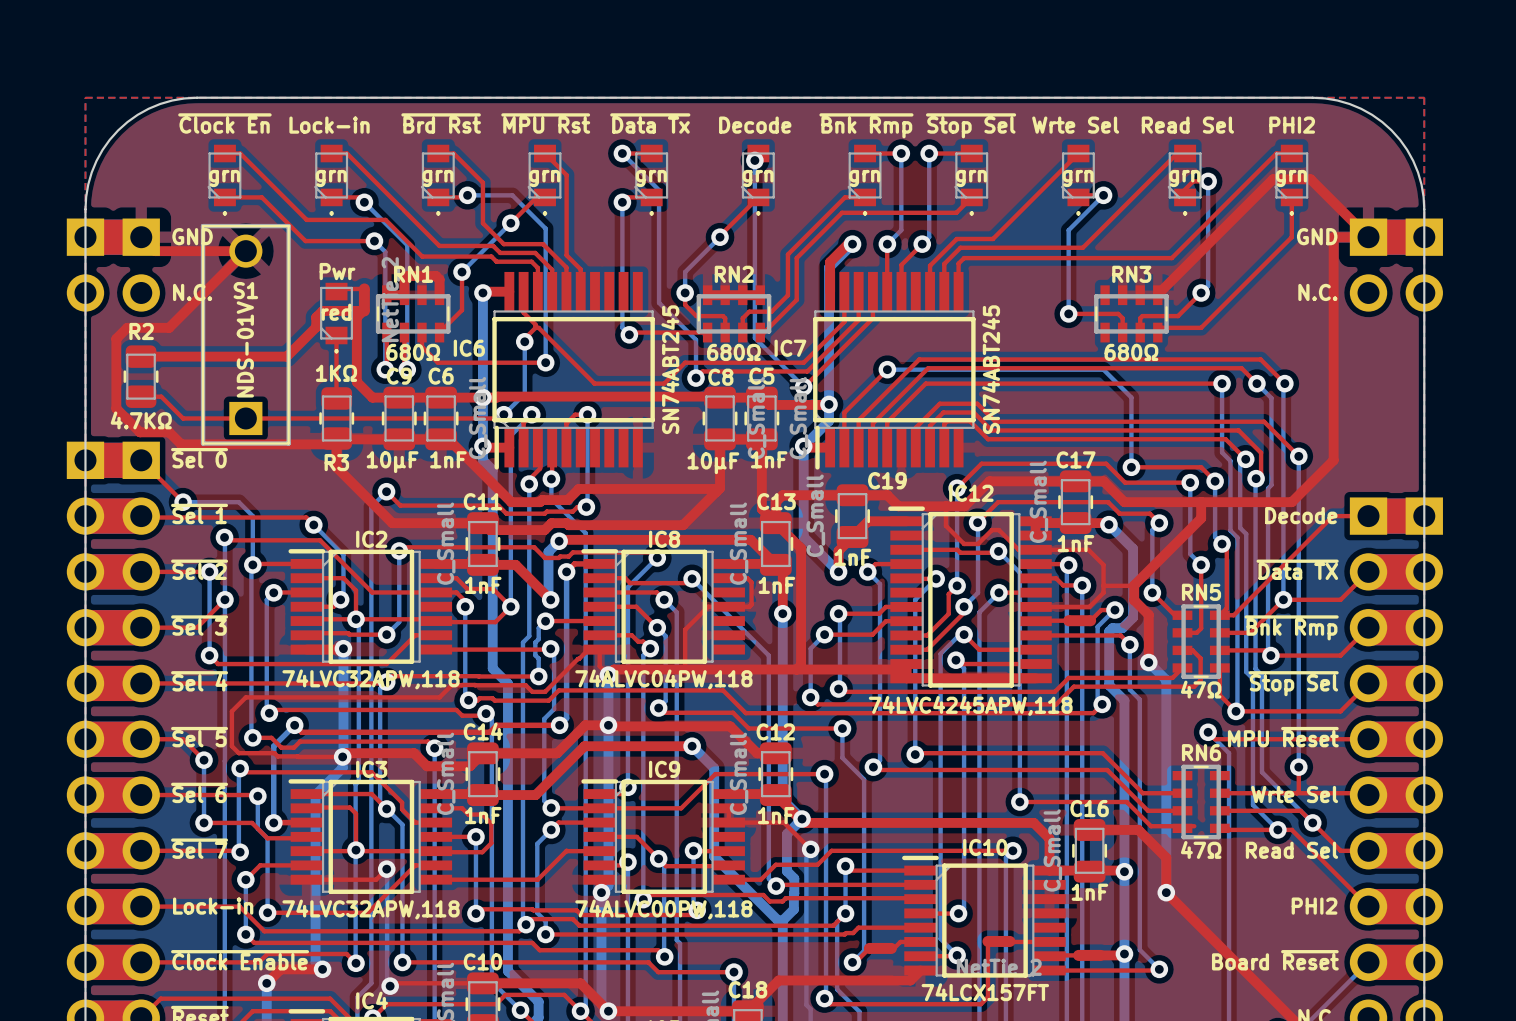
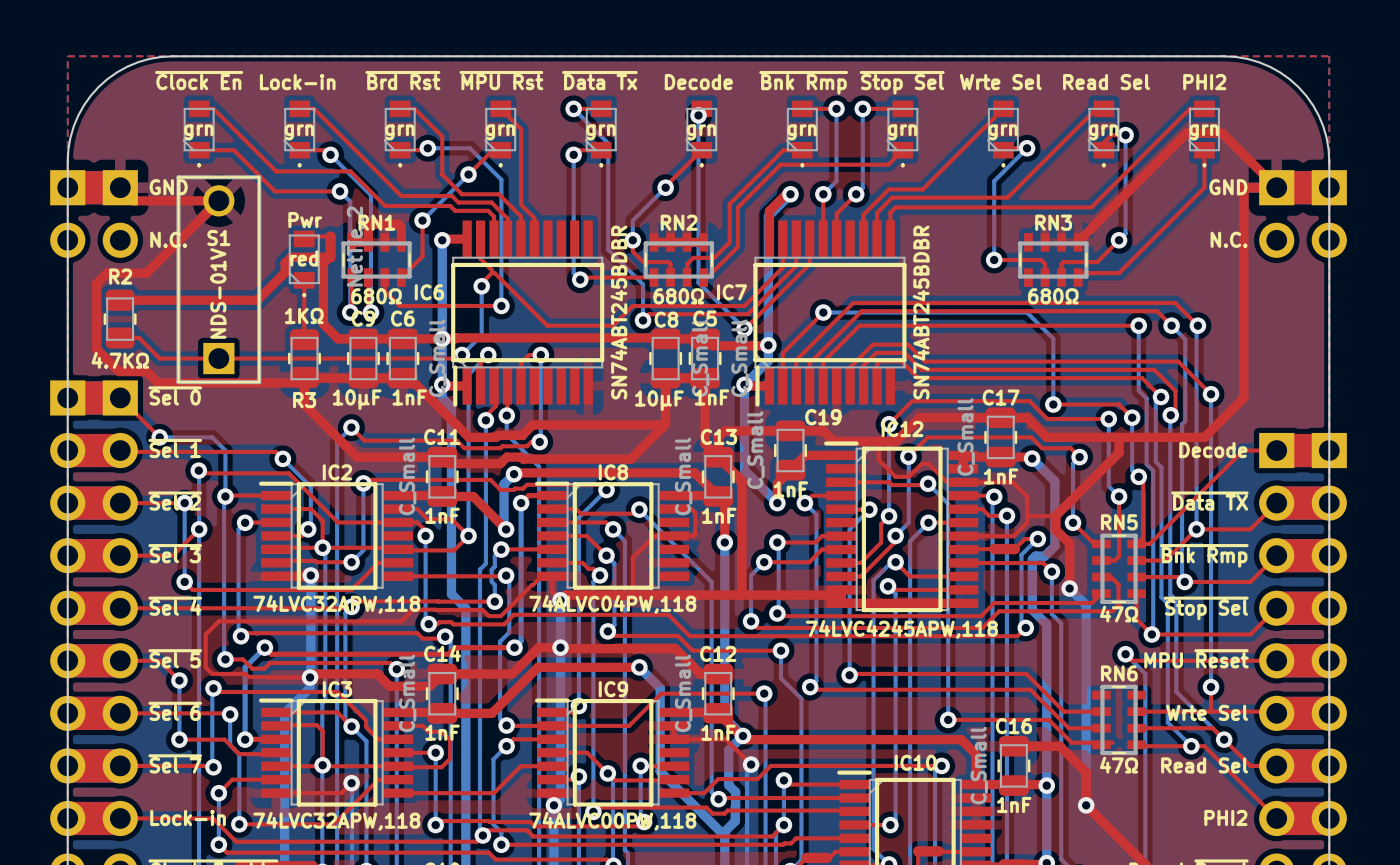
IC6 value: SN74ABT245 (670, 369) -> SN74ABT245BDBR (618, 312)
IC7 value: SN74ABT245 (991, 369) -> SN74ABT245BDBR (921, 312)

